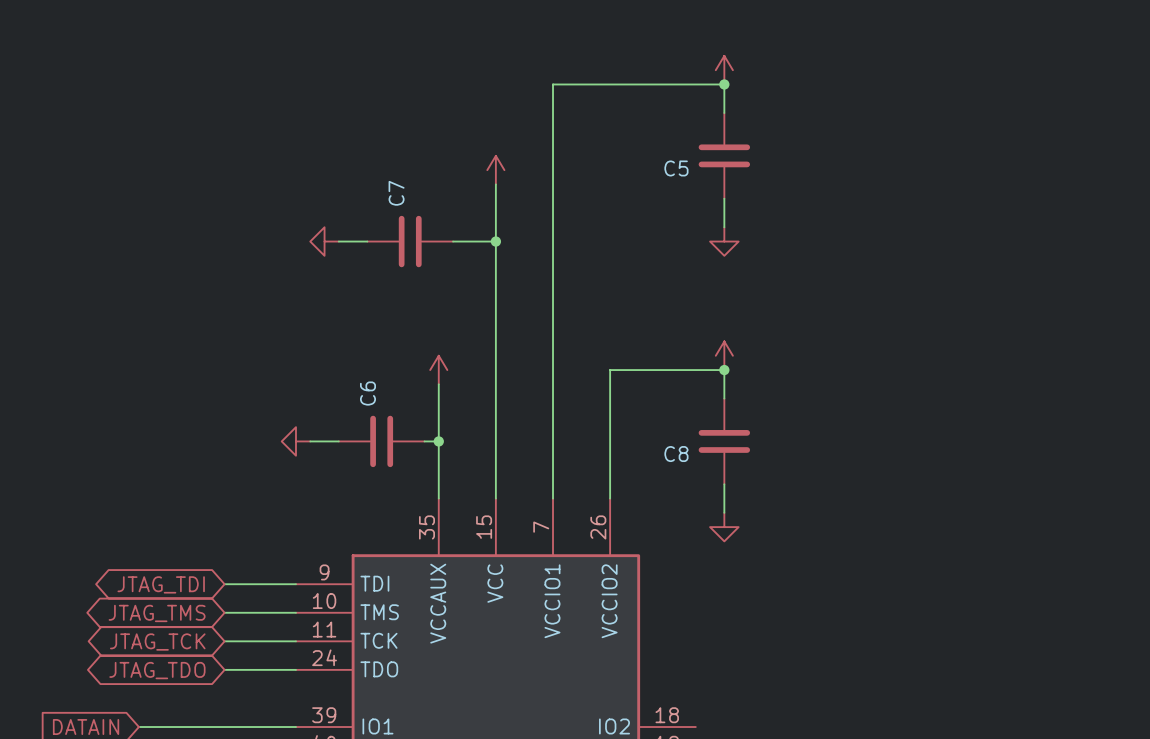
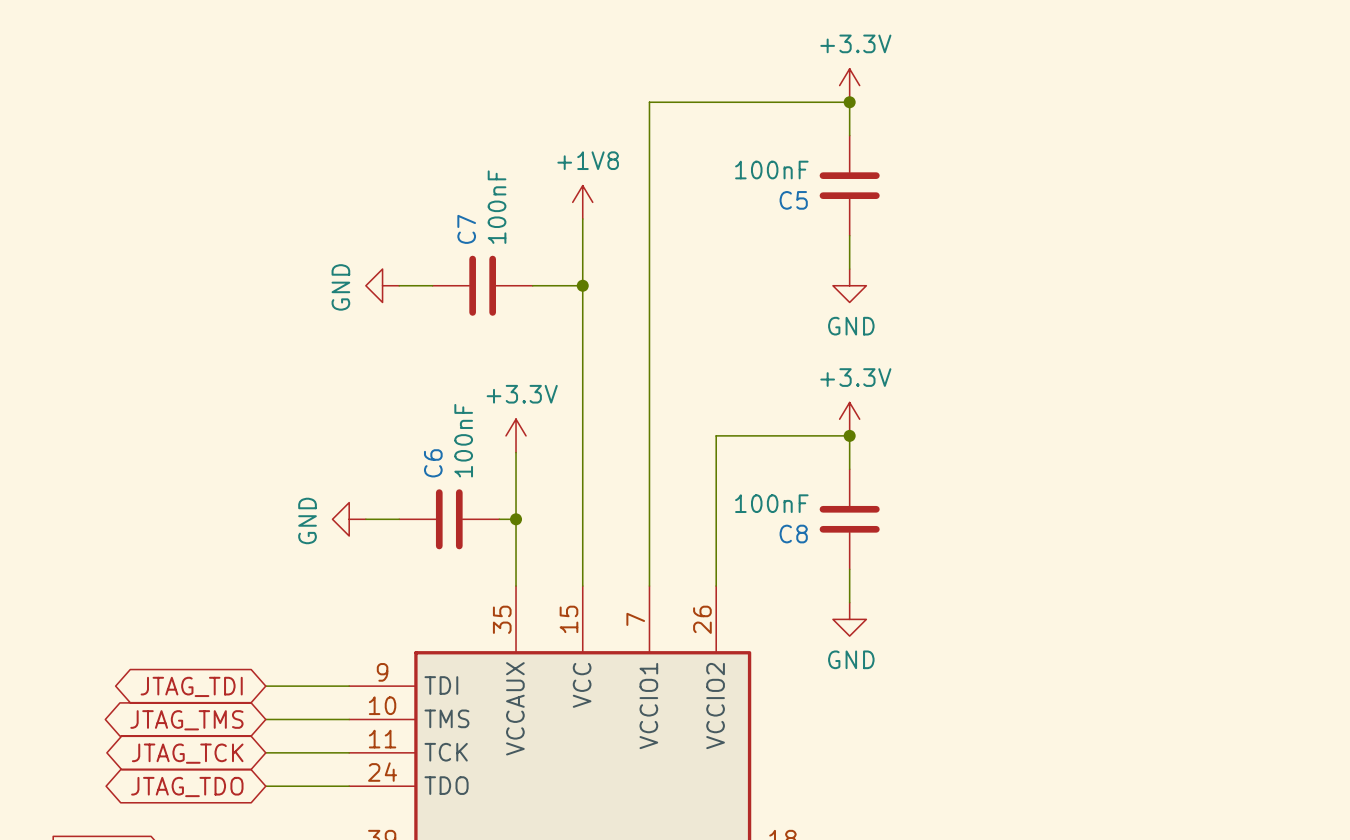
power symbol text: none -> +3.3V (855, 43)
power symbol text: none -> +1V8 (588, 160)
C5 value: none -> 100nF (771, 170)
C7 value: none -> 100nF (497, 207)
power symbol text: none -> GND (340, 287)
power symbol text: none -> GND (851, 326)
power symbol text: none -> +3.3V (855, 377)
power symbol text: none -> +3.3V (522, 394)
C6 value: none -> 100nF (463, 440)
C8 value: none -> 100nF (771, 503)
power symbol text: none -> GND (307, 520)
power symbol text: none -> GND (851, 659)

